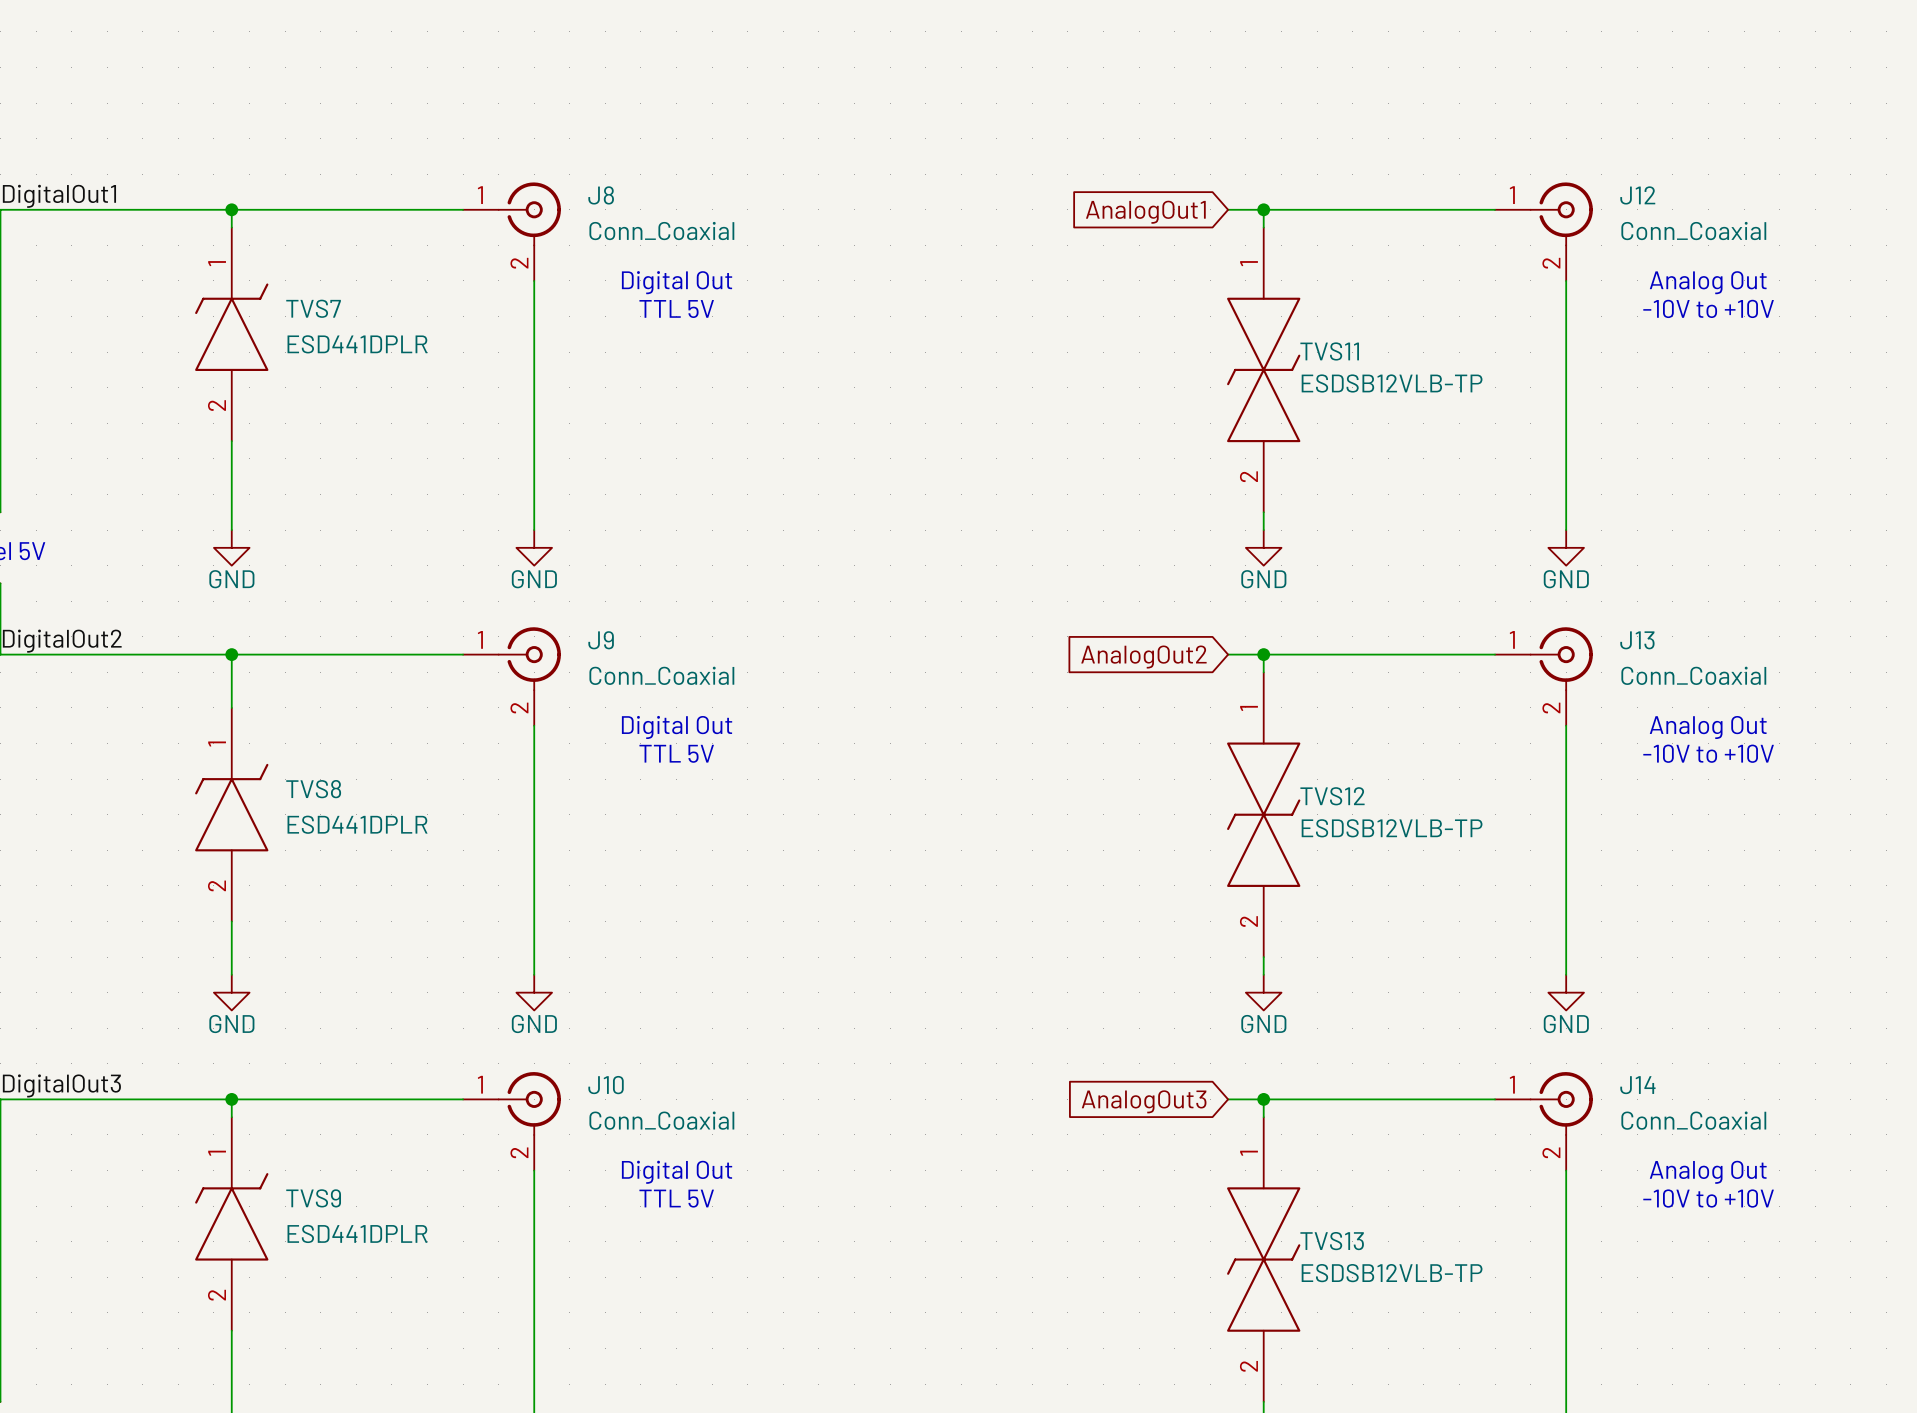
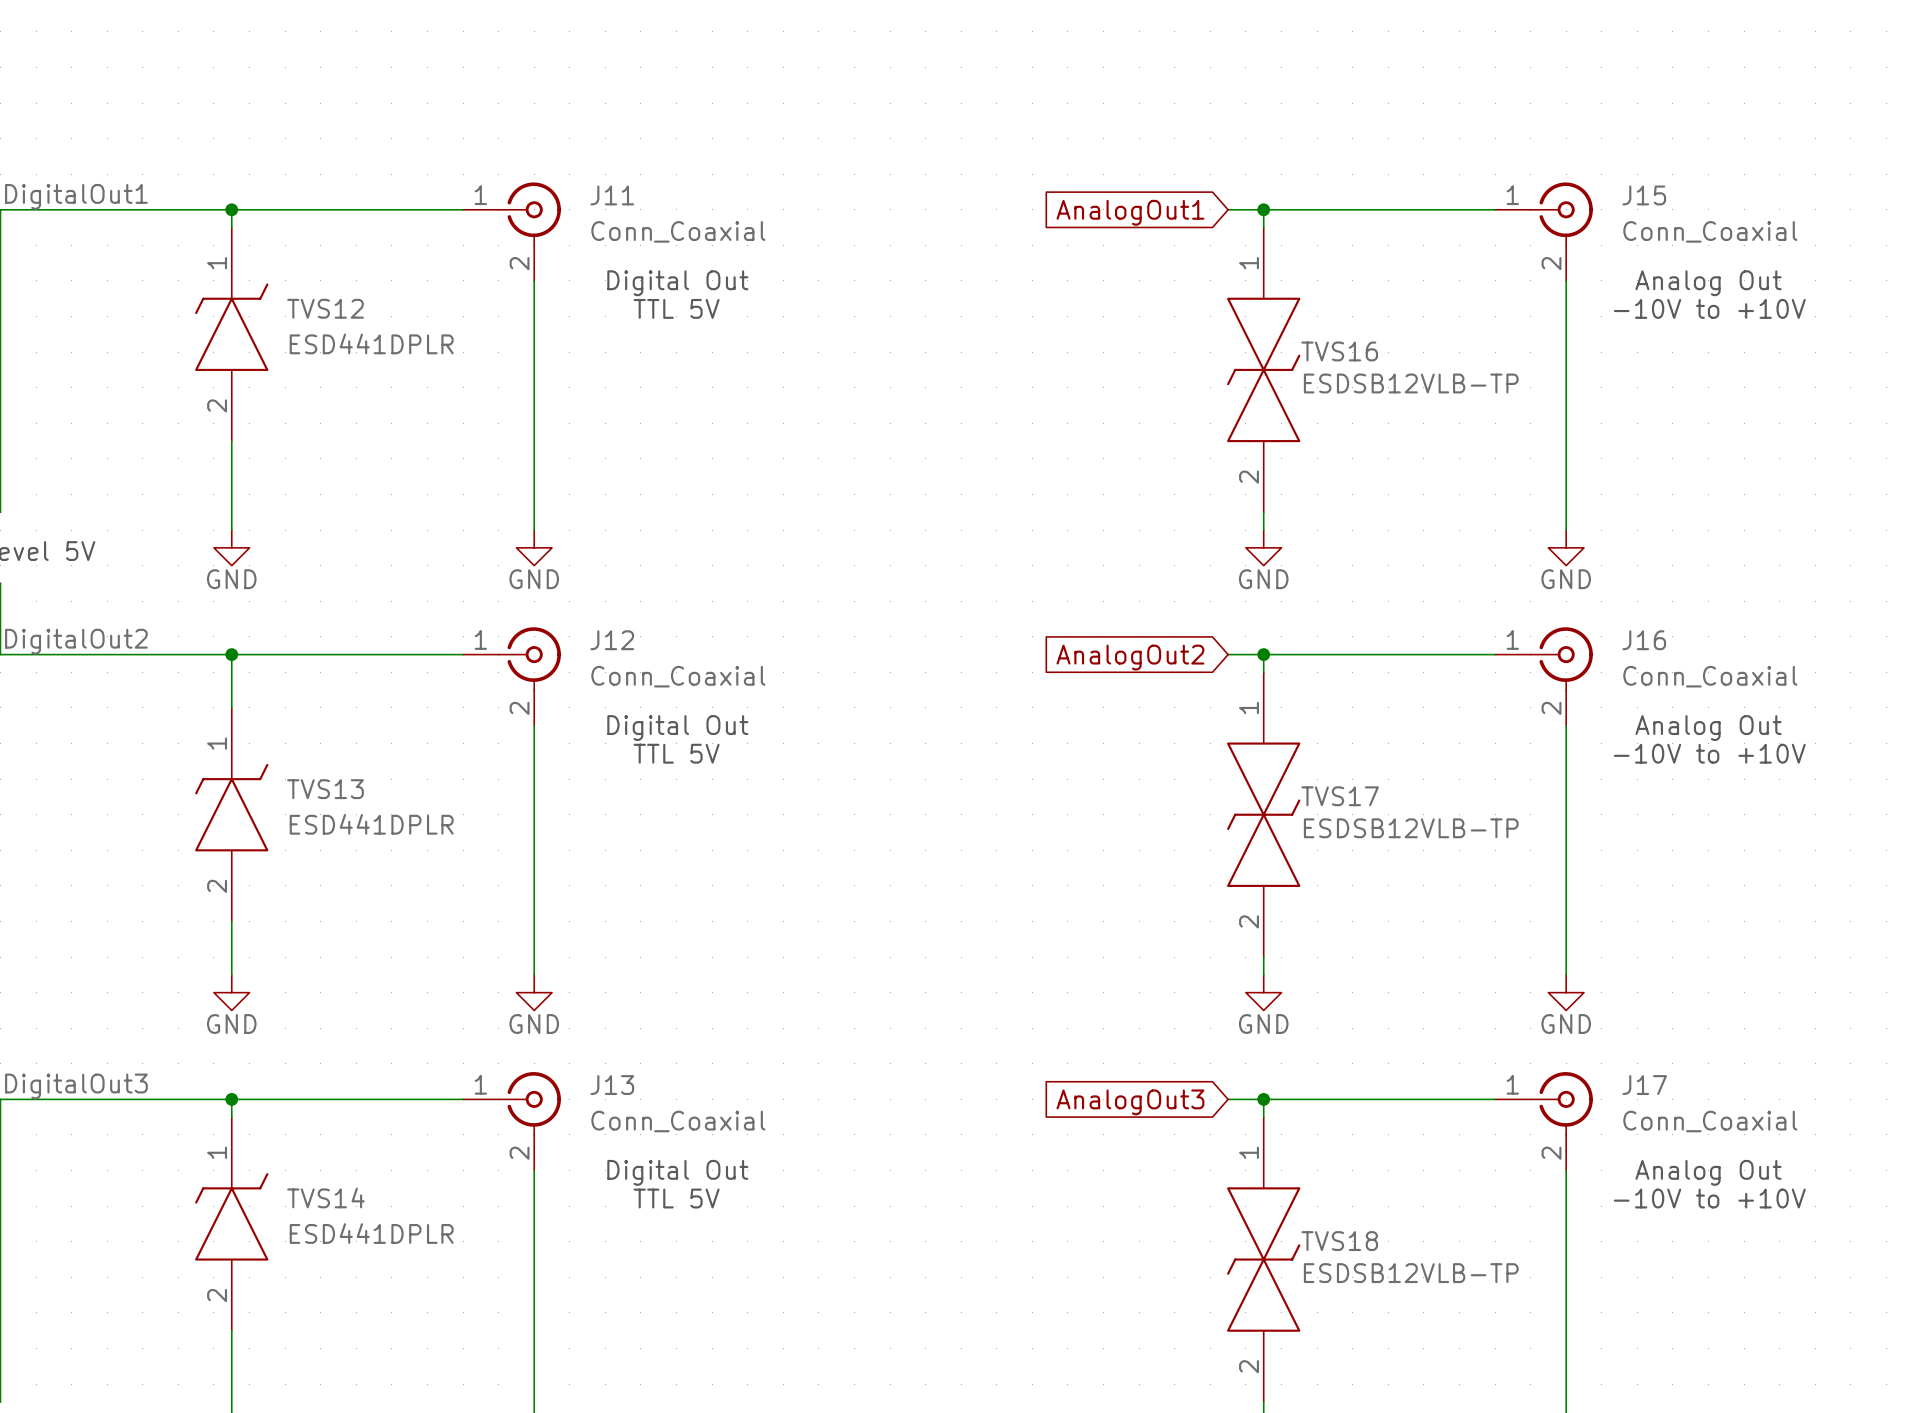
J8 name: J8 (601, 195) -> J11 (612, 195)
J12 name: J12 (1637, 195) -> J15 (1644, 195)
TVS7 name: TVS7 (313, 308) -> TVS12 (325, 308)
TVS11 name: TVS11 (1329, 351) -> TVS16 (1339, 351)
J9 name: J9 (601, 640) -> J12 (612, 640)
J13 name: J13 (1637, 640) -> J16 (1644, 640)
TVS8 name: TVS8 (313, 789) -> TVS13 (325, 789)
TVS12 name: TVS12 (1332, 796) -> TVS17 (1340, 796)
J10 name: J10 (606, 1085) -> J13 (612, 1085)
J14 name: J14 (1637, 1085) -> J17 (1644, 1085)
TVS9 name: TVS9 (313, 1198) -> TVS14 (325, 1197)
TVS13 name: TVS13 (1332, 1241) -> TVS18 (1339, 1241)

